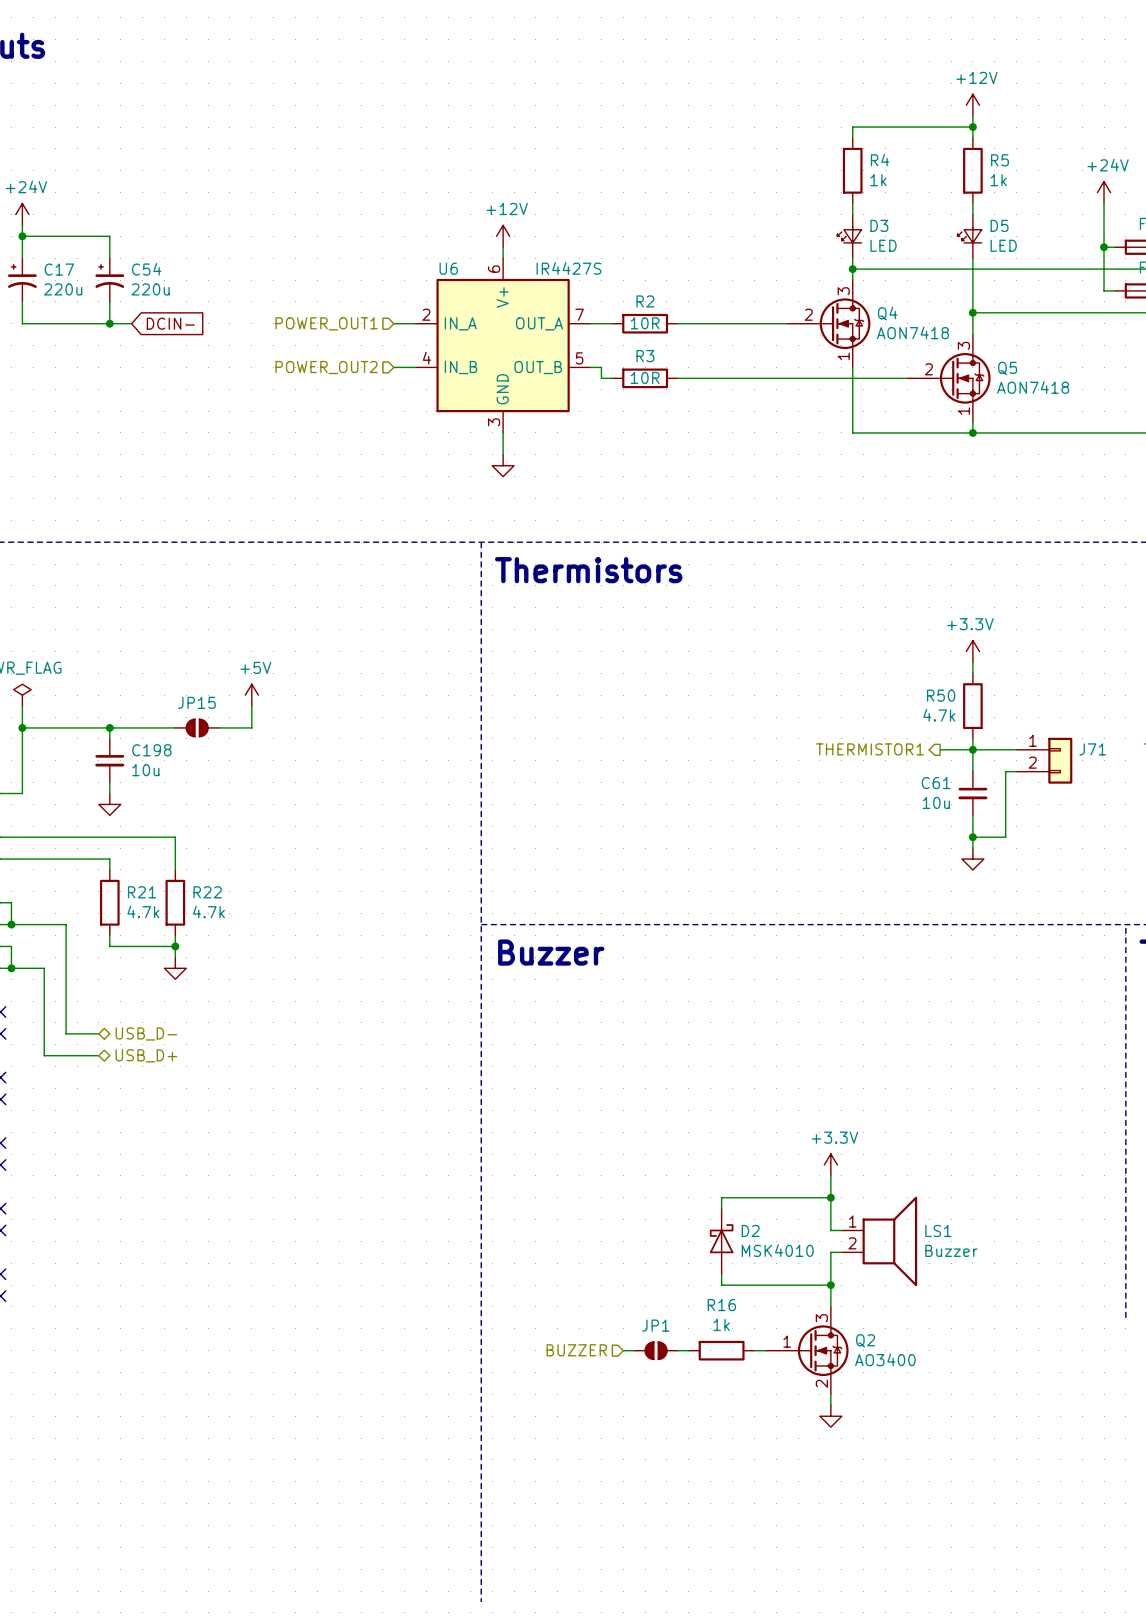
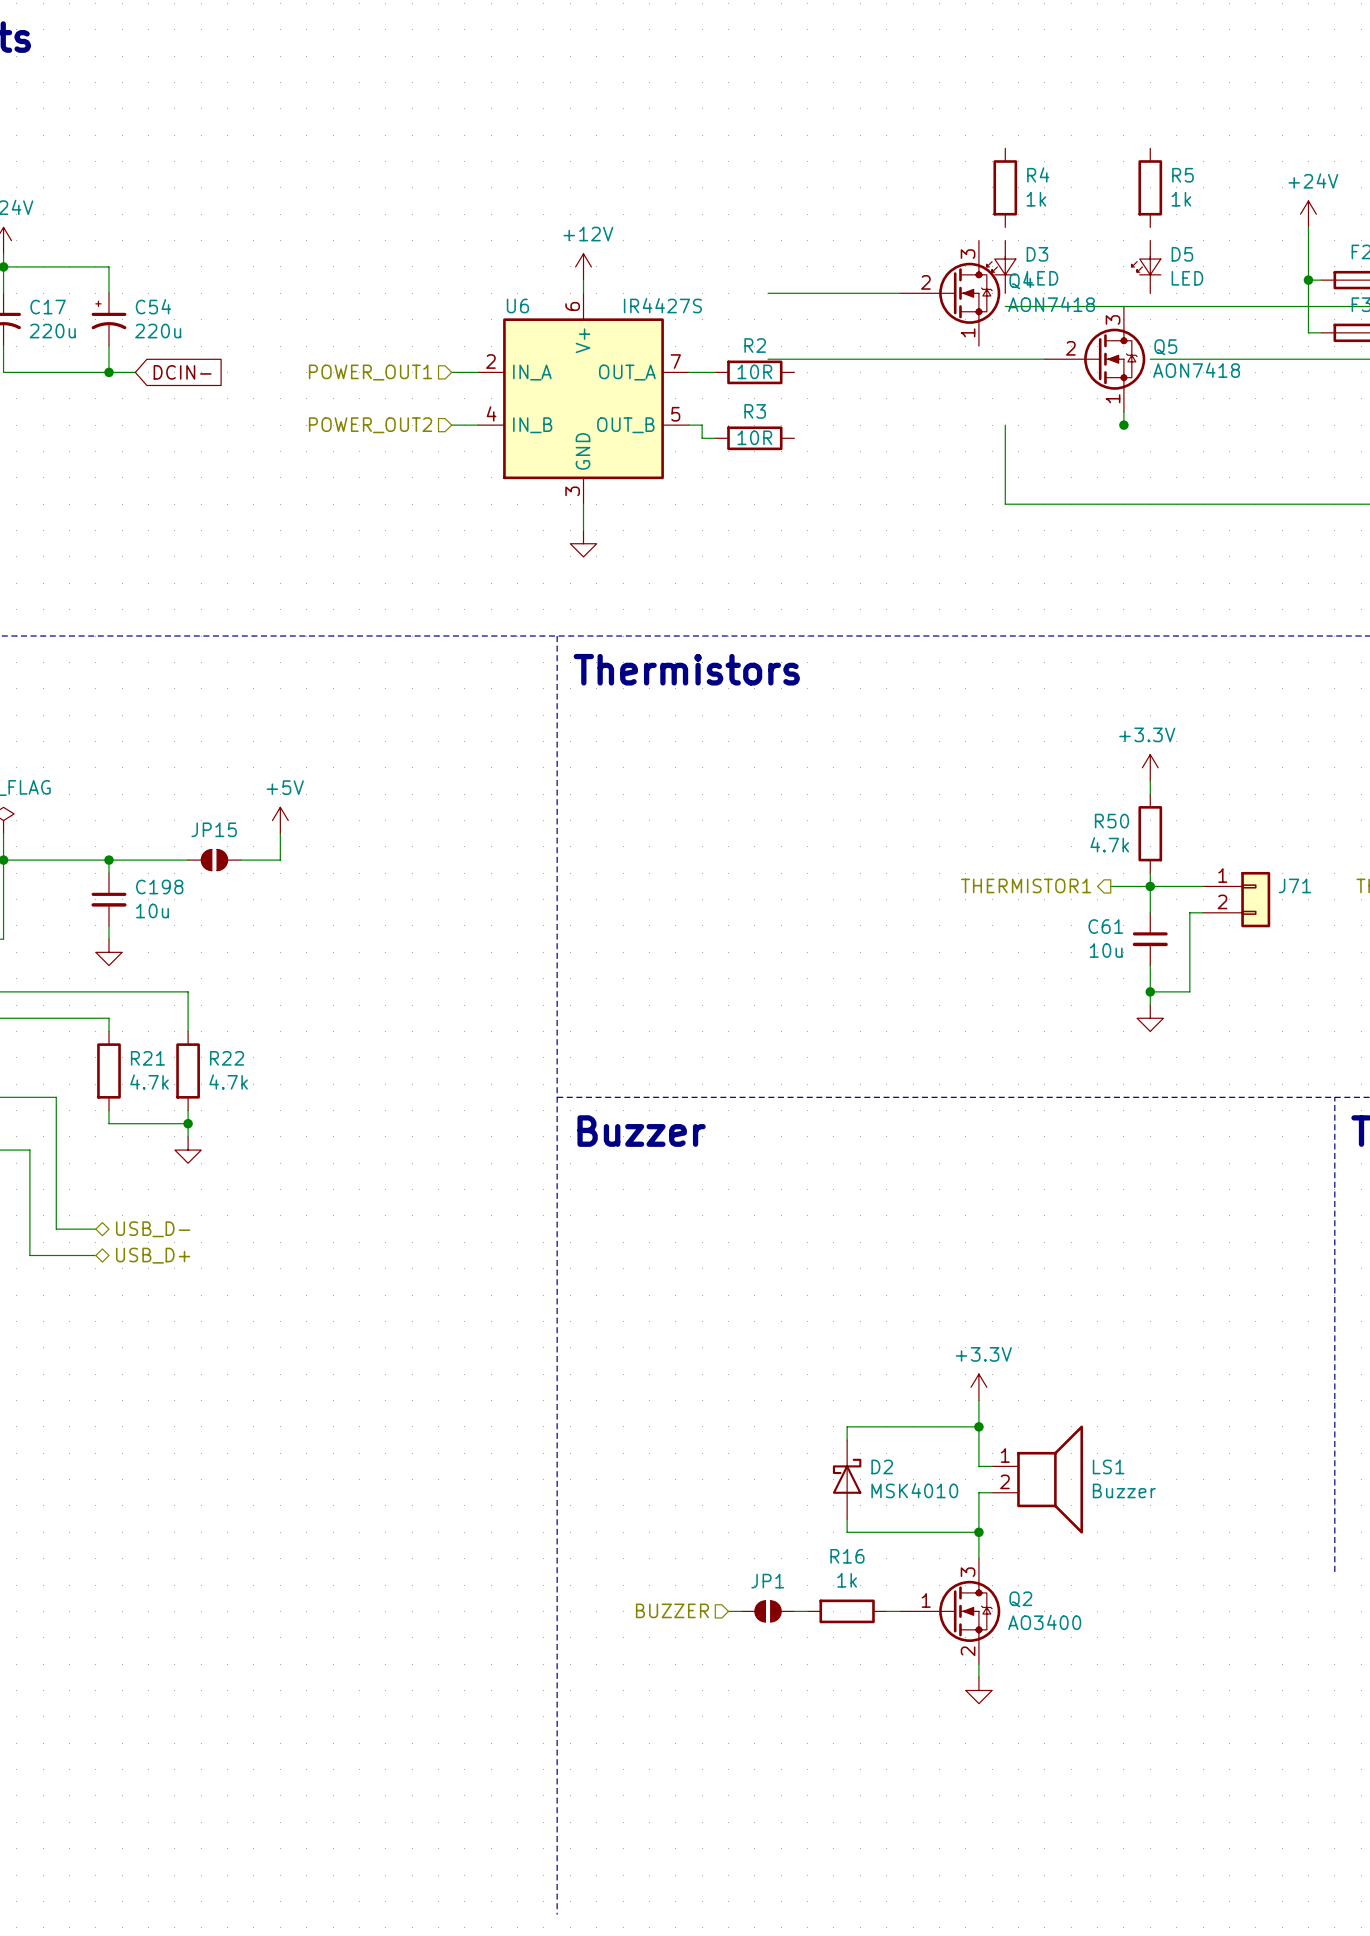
power symbol: +12V (972, 105) -> none
wire: (972, 116) (972, 137) -> none
wire: (972, 127) (852, 127) (852, 137) -> none
junction: (972, 127) -> none
wire: (852, 203) (852, 214) -> none
wire: (972, 203) (972, 214) -> none
wire: (852, 258) (852, 280) -> none
wire: (972, 258) (972, 334) -> none
junction: (852, 269) -> none
junction: (972, 312) -> none
wire: (677, 323) (787, 323) -> (768, 293) (899, 293)
Q4 position: (828, 323) -> (950, 293)
junction: none -> (1123, 425)
wire: (677, 378) (907, 378) -> (768, 359) (1044, 359)
Q5 position: (948, 378) -> (1095, 359)
wire: (972, 422) (972, 432) -> (1123, 411) (1123, 425)
junction: (972, 432) -> none

